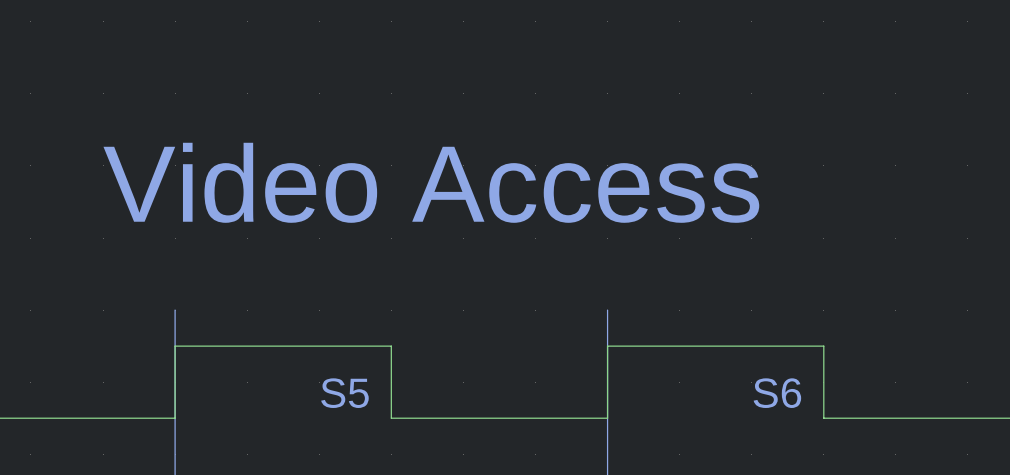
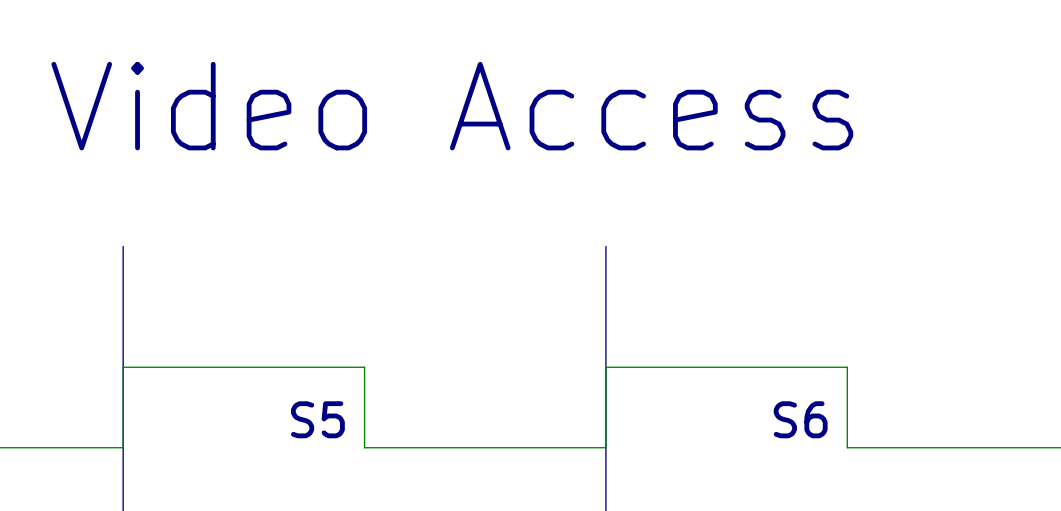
text position: Video Access (431, 182) -> Video Access (452, 106)
bus: none -> (123, 246) (123, 327)
bus: none -> (605, 246) (605, 327)

